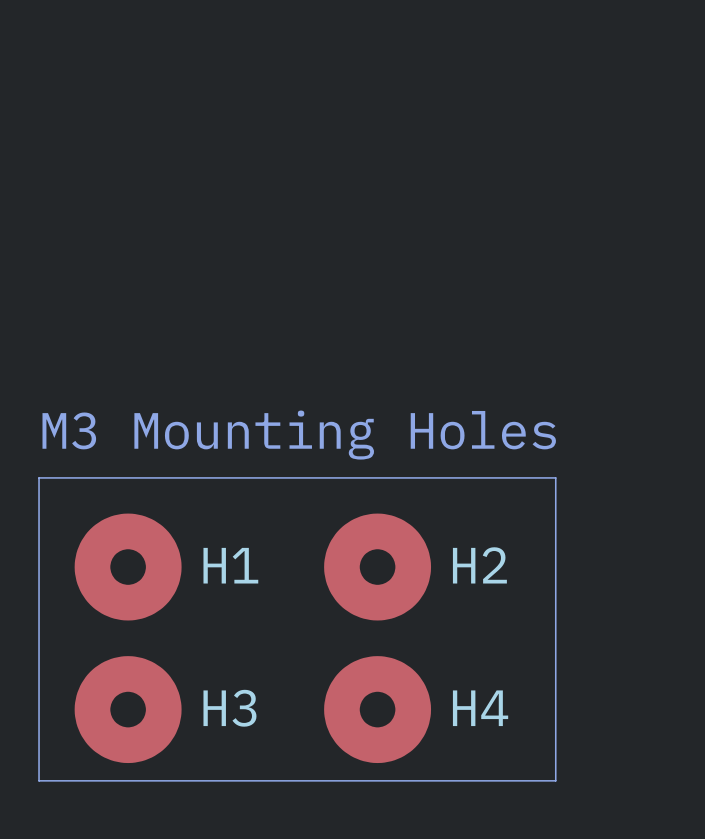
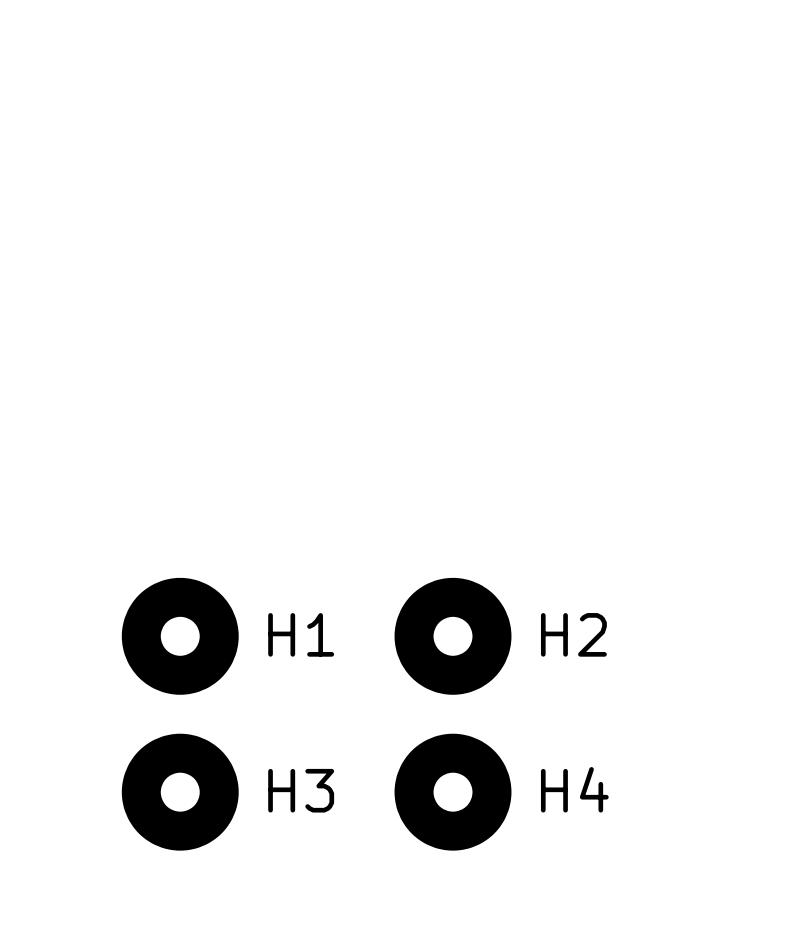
text: M3 Mounting Holes (299, 435) -> none
line: (39, 477) (39, 780) (555, 780) (555, 477) (39, 477) -> none

